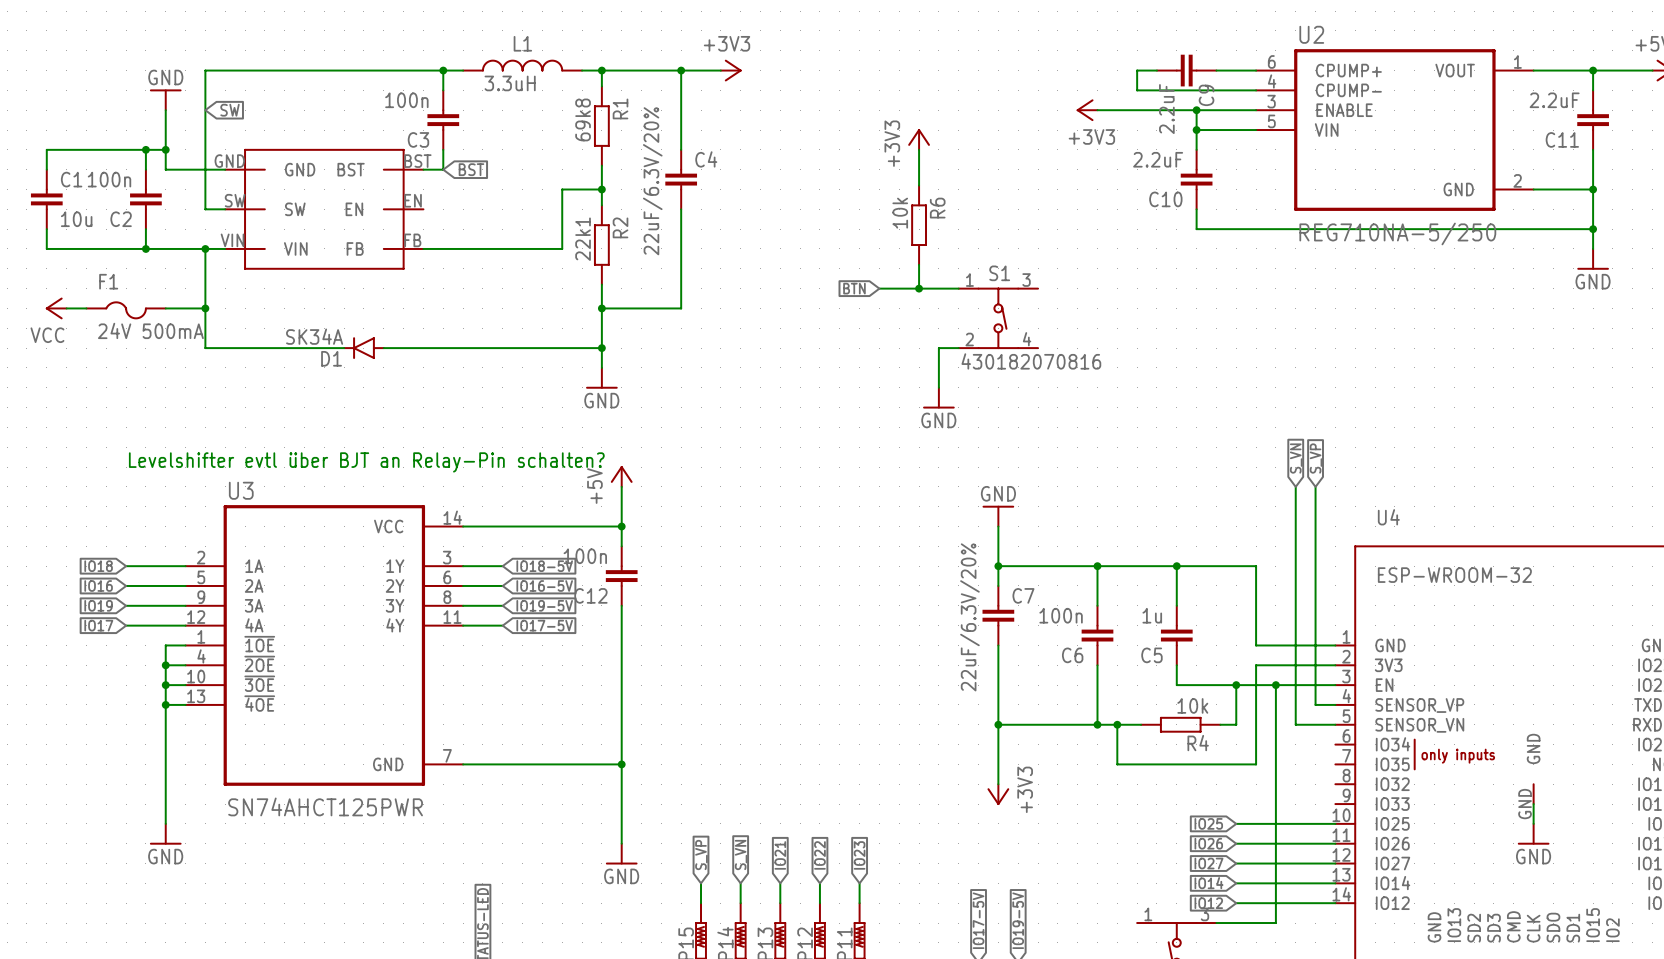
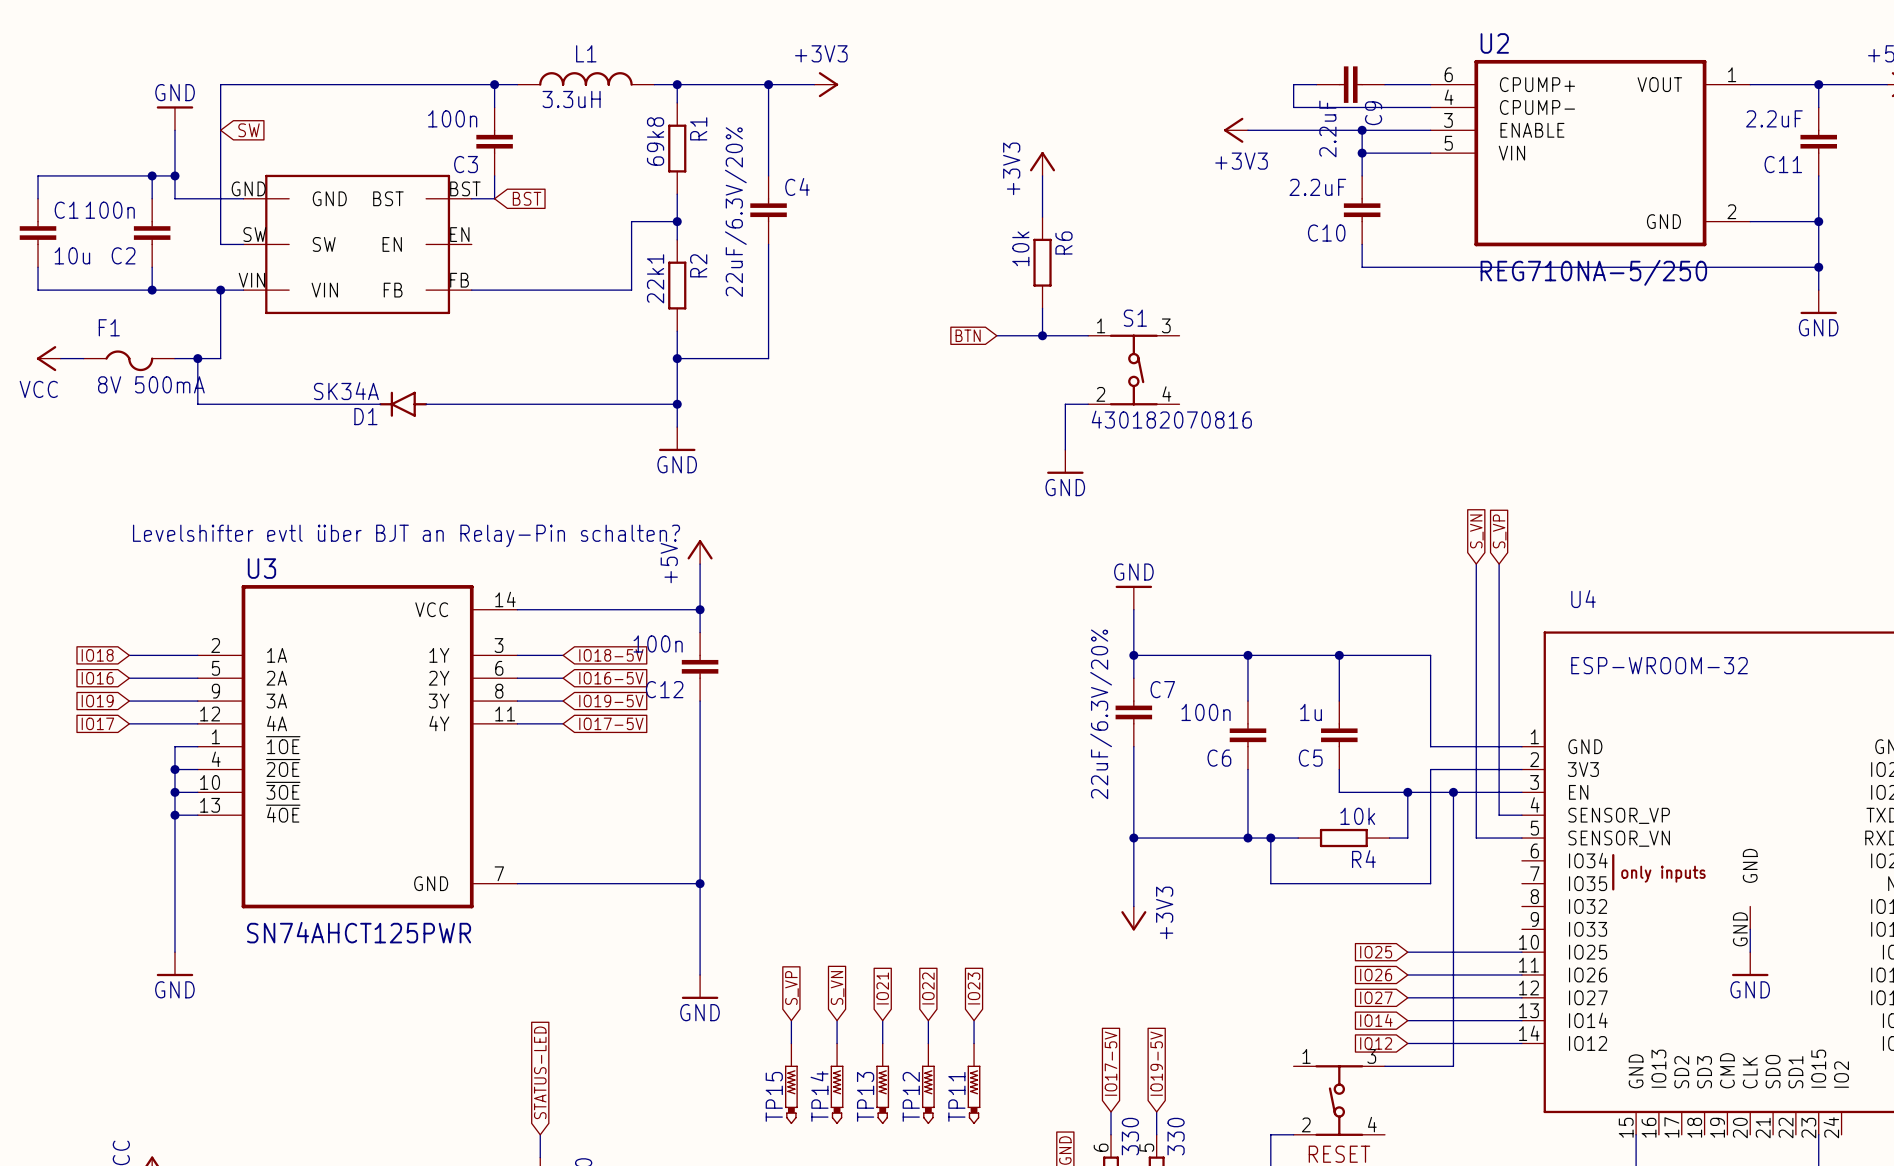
wire: (205, 308) (205, 348) -> (197, 358) (197, 404) (220, 404)
junction position: (205, 308) -> (197, 358)
F1 value: 24V 500mA (150, 330) -> 8V 500mA (151, 384)

